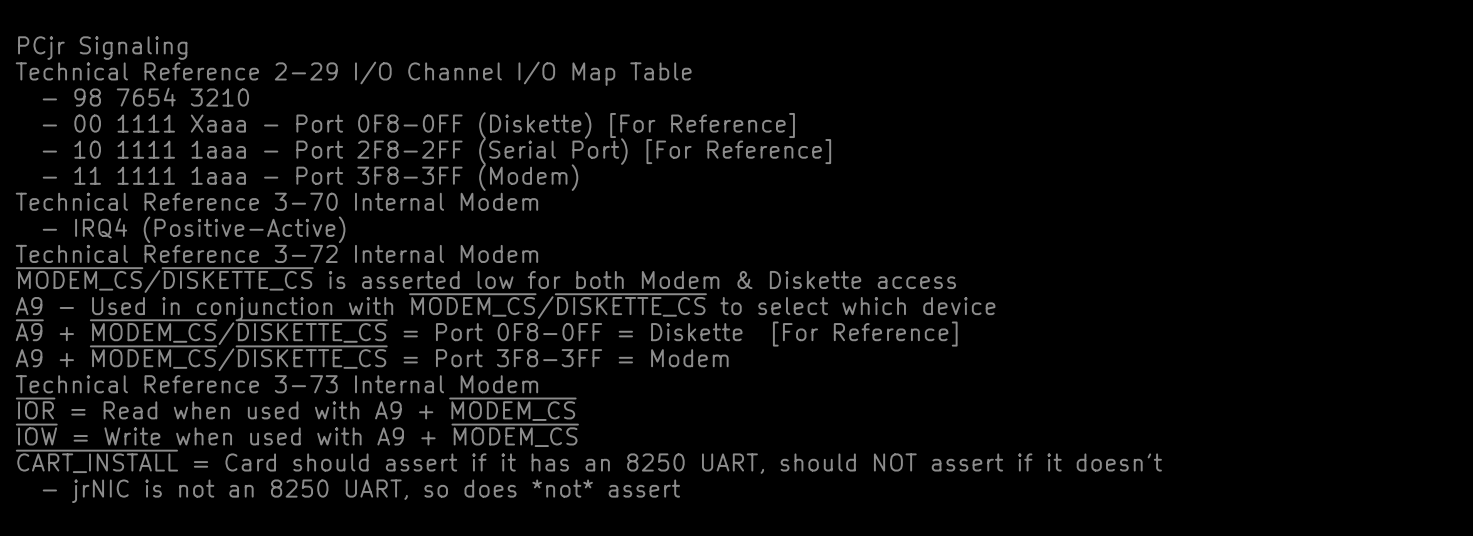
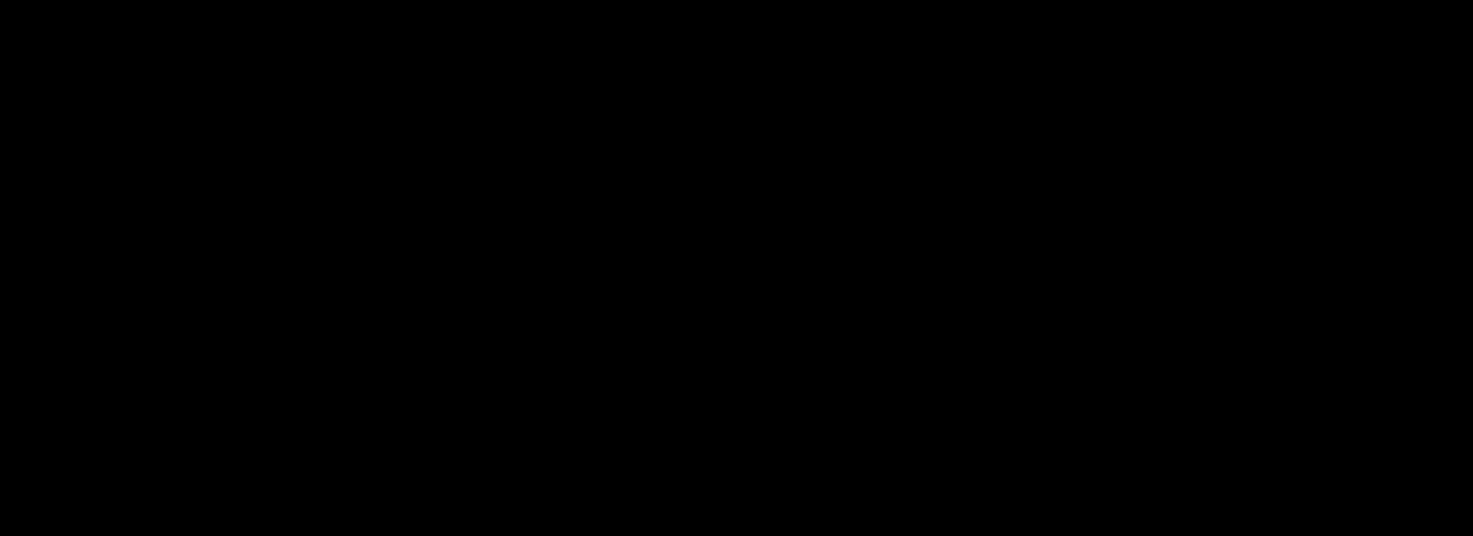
text: PCjr Signaling (102, 48) -> none
text: Technical Reference 2-29 I/O Channel I/O Map Table (353, 73) -> none
text: - 98 7654 3210 (145, 97) -> none
text: - 00 1111 Xaaa - Port 0F8-0FF (Diskette) [For Reference] (418, 125) -> none
text: - 10 1111 1aaa - Port 2F8-2FF (Serial Port) [For Reference] (436, 151) -> none
text: - 11 1111 1aaa - Port 3F8-3FF (Modem) (310, 177) -> none
text: Technical Reference 3-70 Internal Modem (276, 201) -> none
text: - IRQ4 (Positive-Active) (194, 229) -> none
text: Technical Reference 3-72 Internal Modem (276, 253) -> none
text: ~{MODEM_CS}/~{DISKETTE_CS} is asserted low for both Modem & Diskette access (485, 280) -> none
text: A9 - Used in conjunction with ~{MODEM_CS}/~{DISKETTE_CS} to select which device (505, 306) -> none
text: ~{A9} + ~{MODEM_CS}/~{DISKETTE_CS} = Port 0F8-0FF = Diskette [For Reference] (486, 332) -> none
text: A9 + ~{MODEM_CS}/~{DISKETTE_CS} = Port 3F8-3FF = Modem (372, 358) -> none
text: Technical Reference 3-73 Internal Modem (276, 384) -> none
text: ~{IOR} = Read when used with A9 + ~{MODEM_CS} (296, 409) -> none
text: ~{IOW} = Write when used with A9 + ~{MODEM_CS} (297, 435) -> none
text: ~{CART_INSTALL} = Card should assert if it has an 8250 UART, should NOT assert if it doesn't (588, 461) -> none
text: - jrNIC is not an 8250 UART, so does *not* assert (361, 491) -> none

